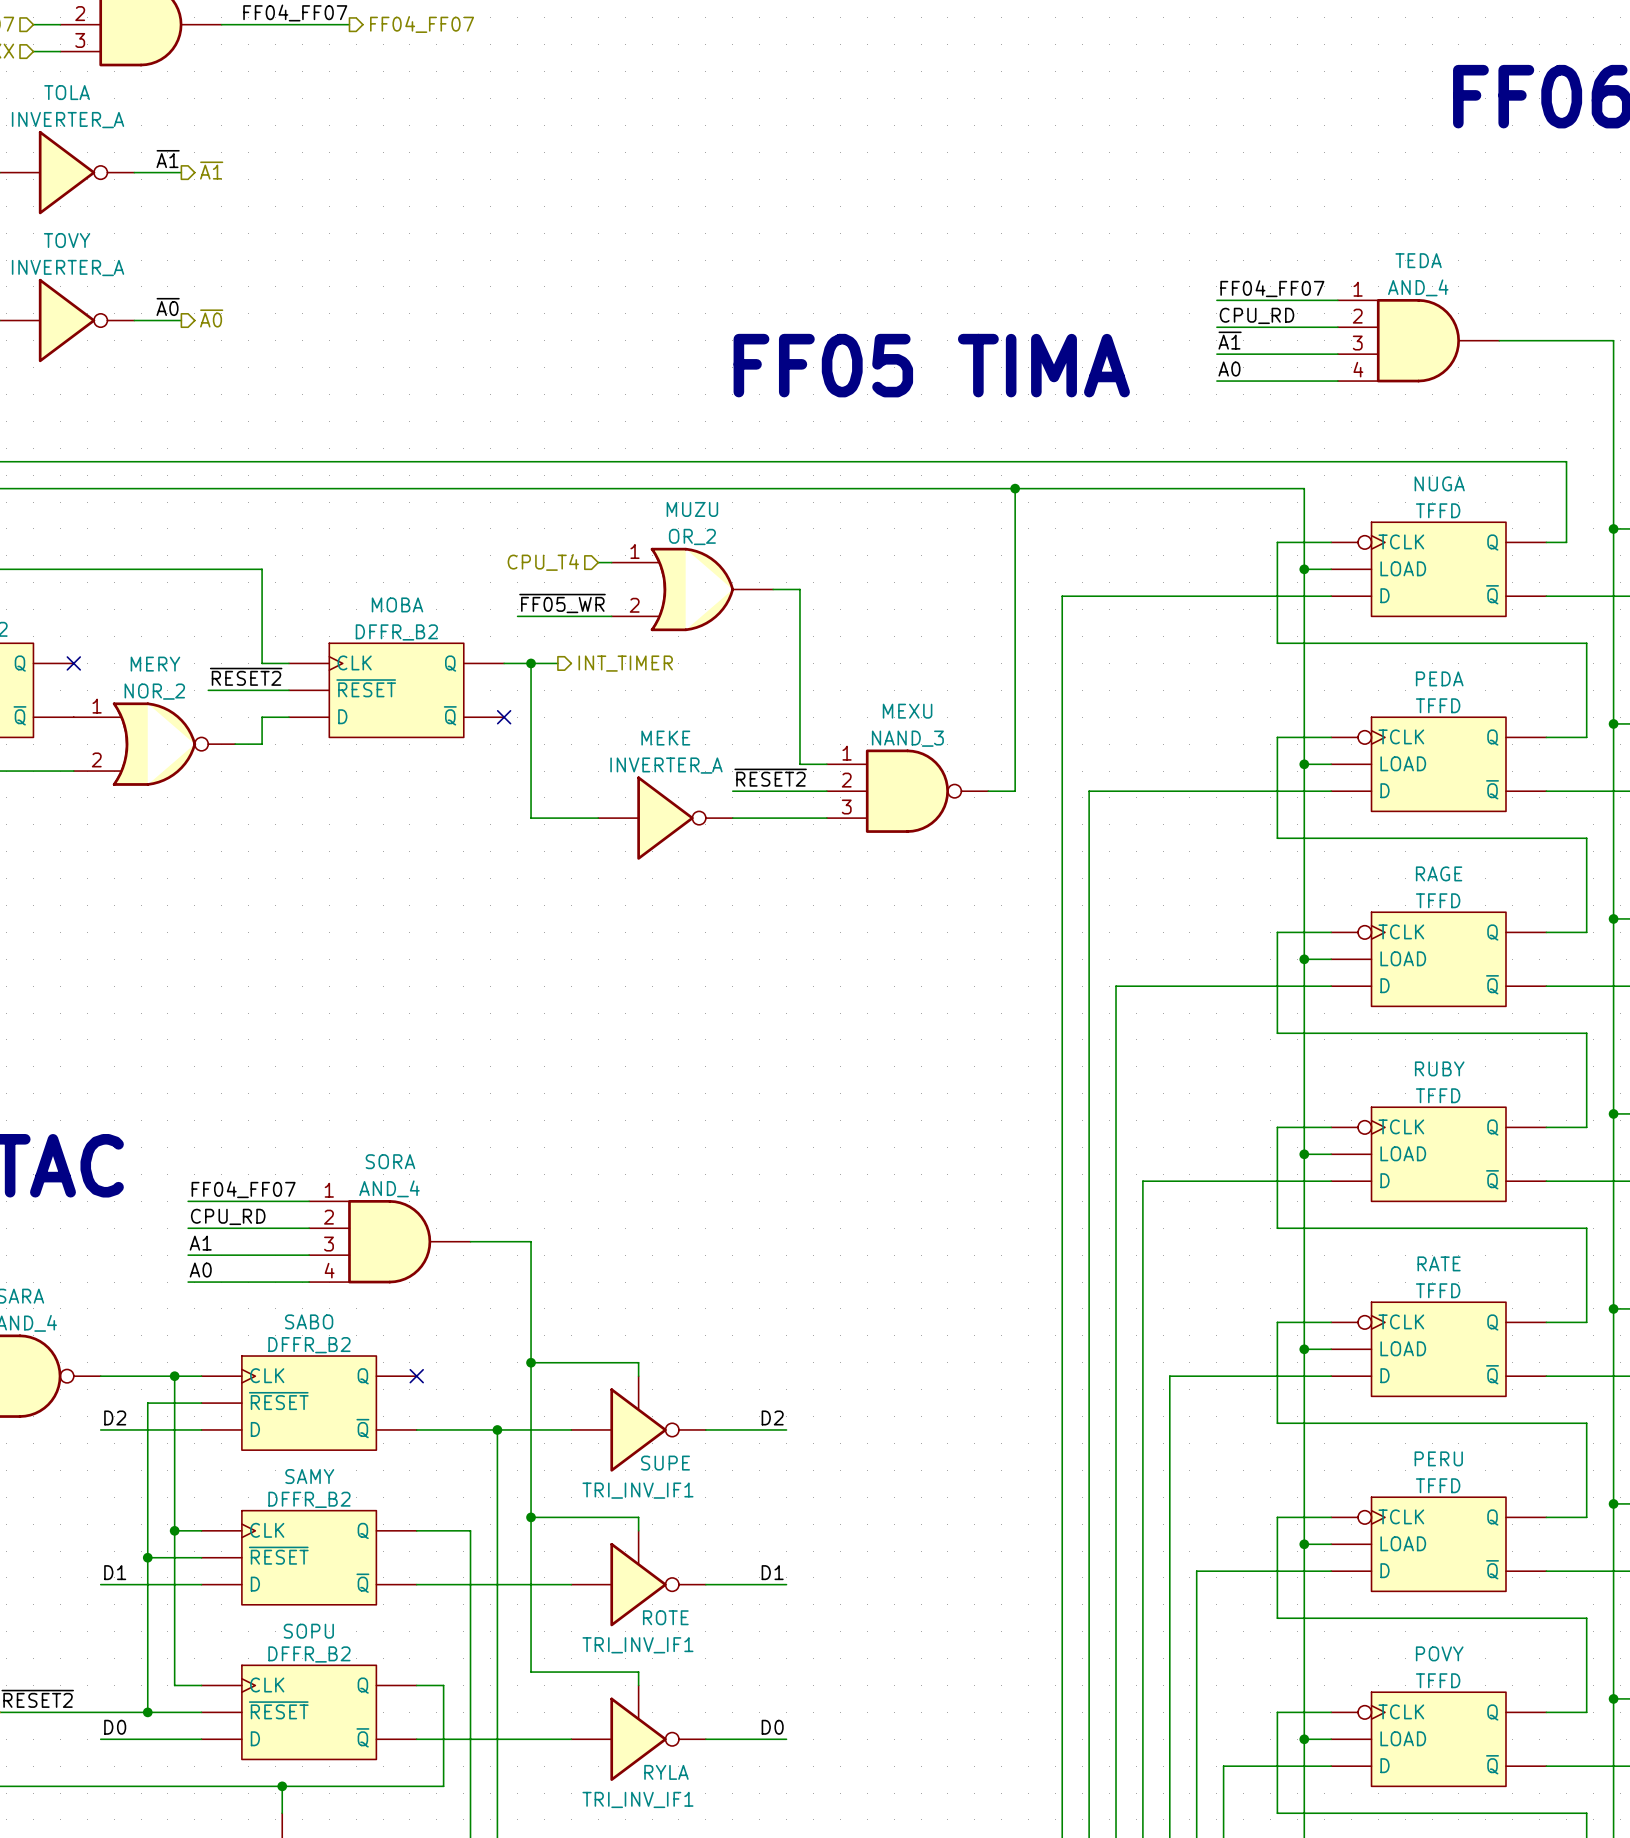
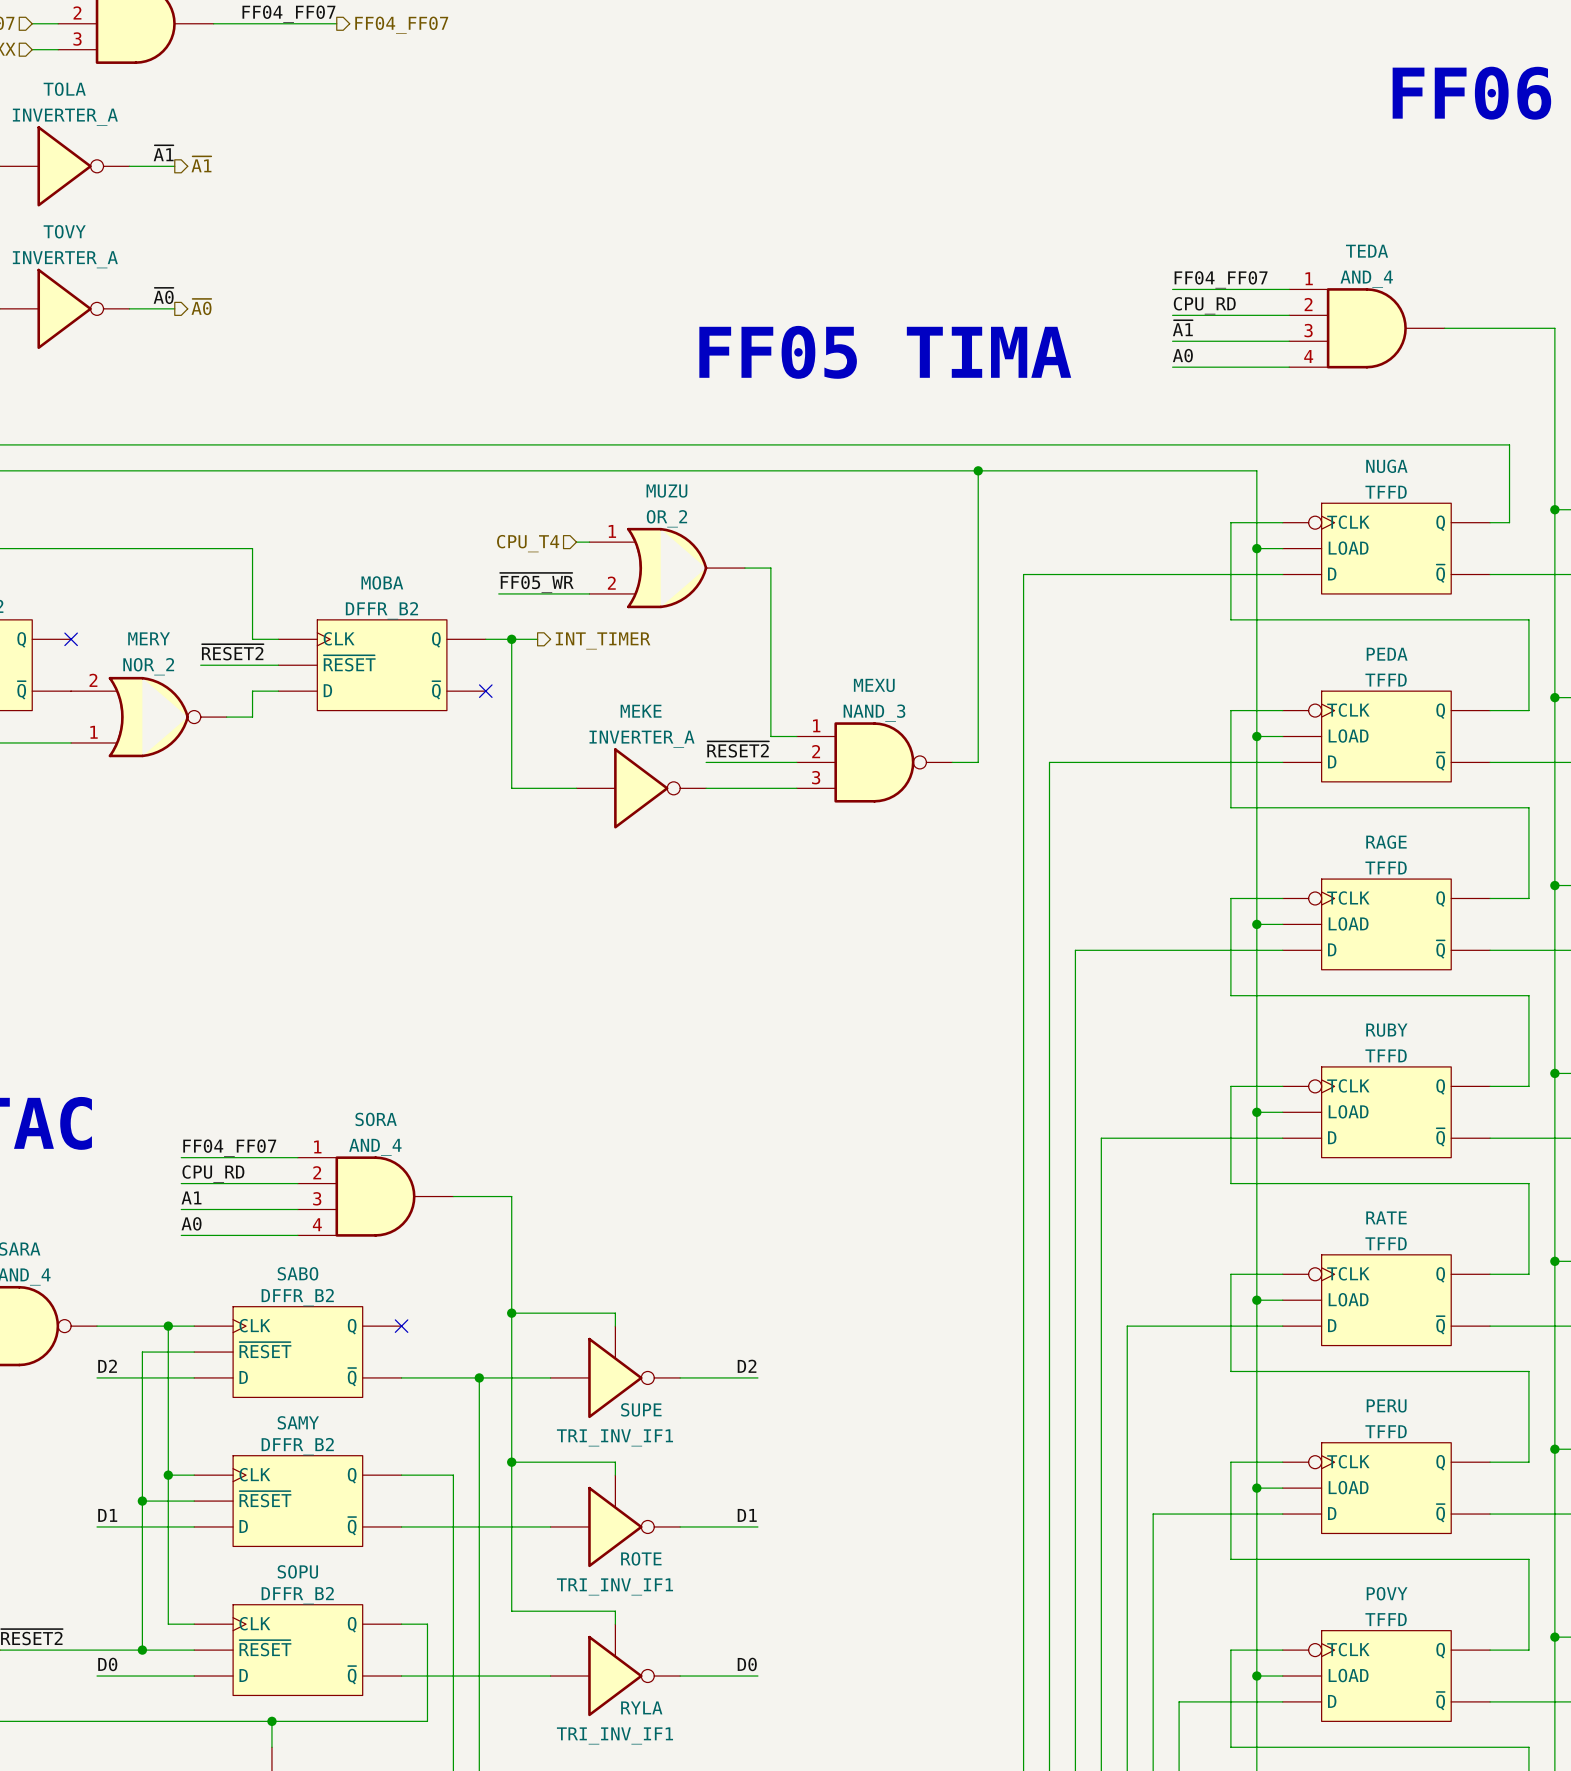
MERY flip: as is (154, 744) -> up-down (148, 717)

